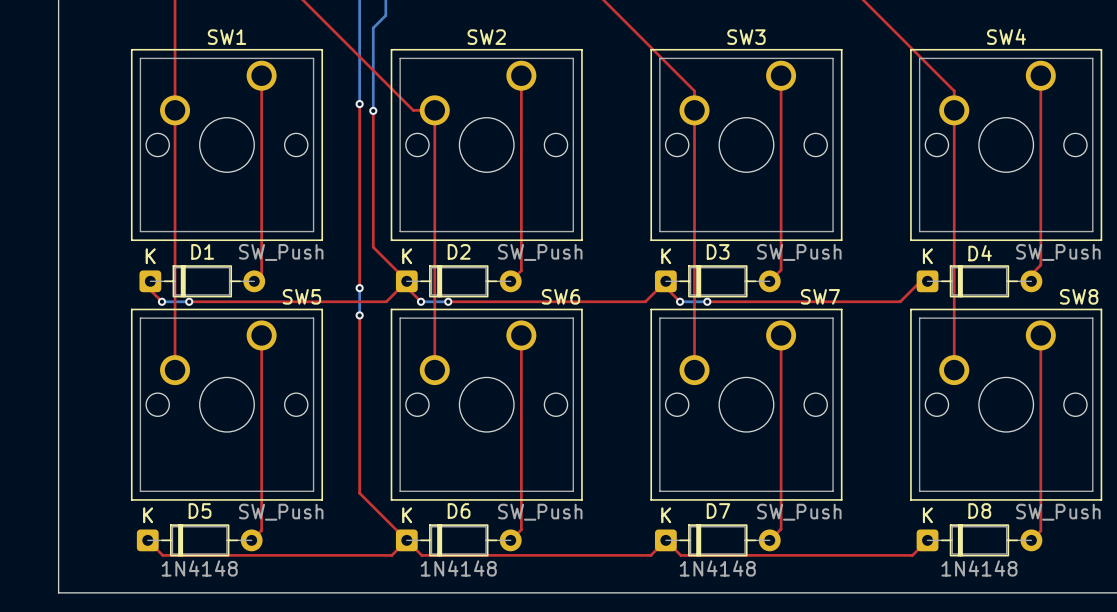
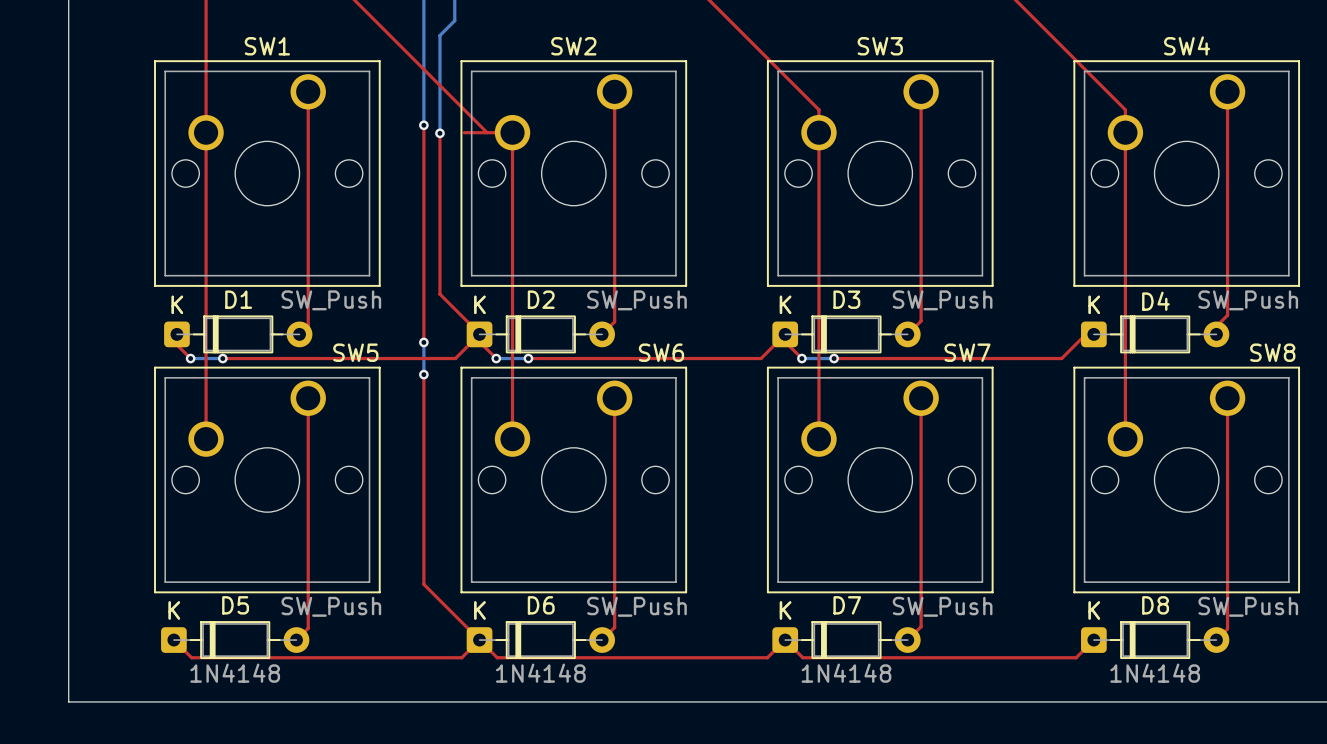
top track: none -> (464, 132) (487, 132)

